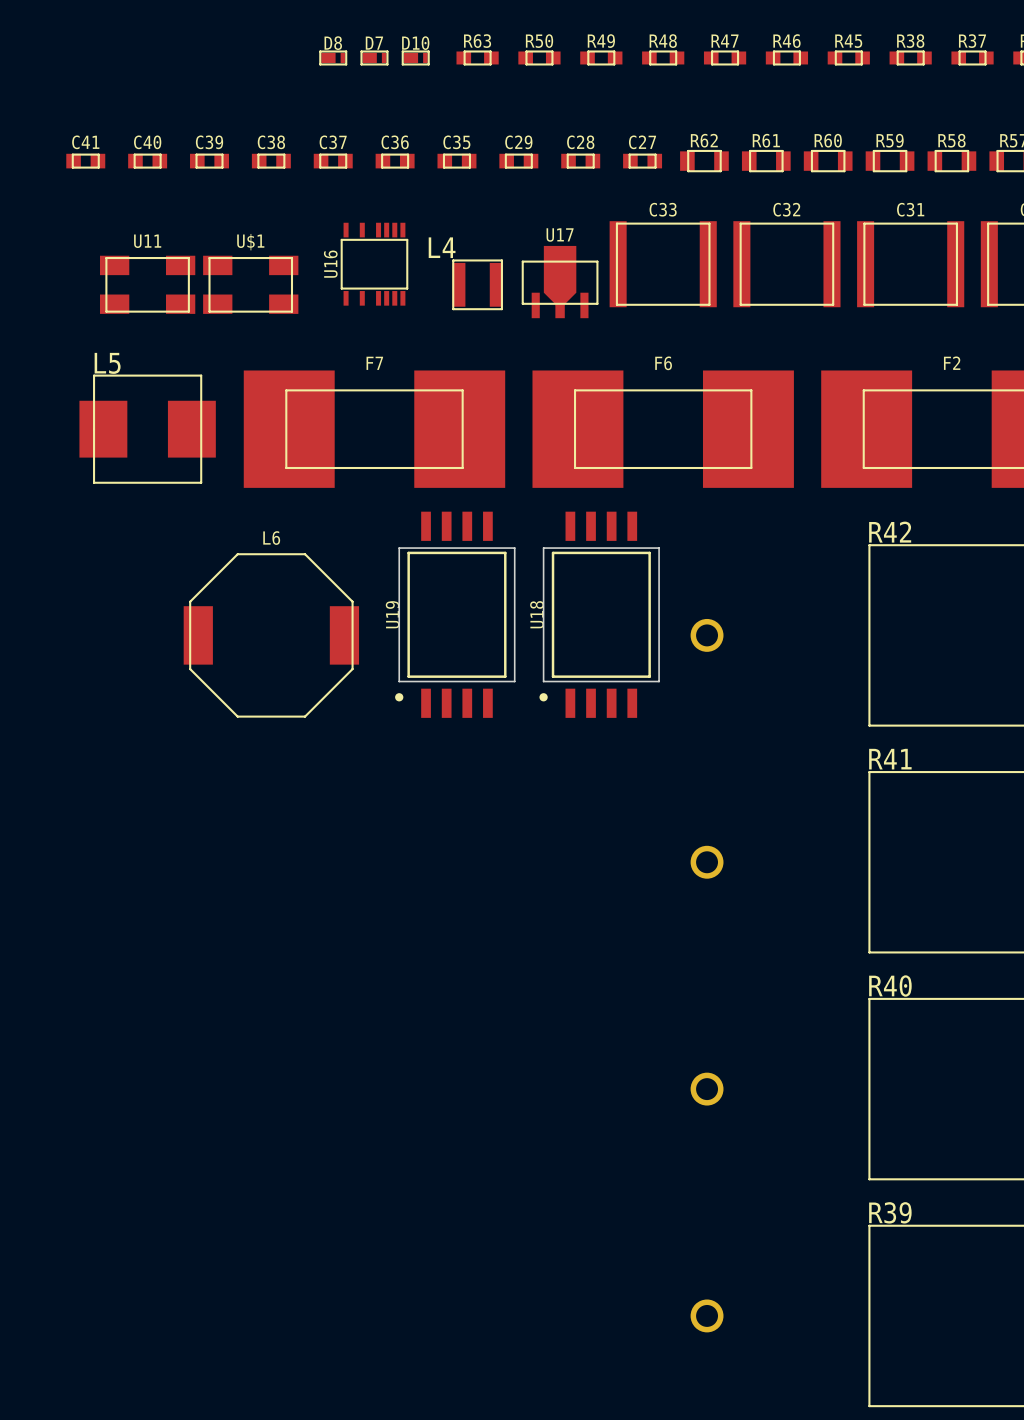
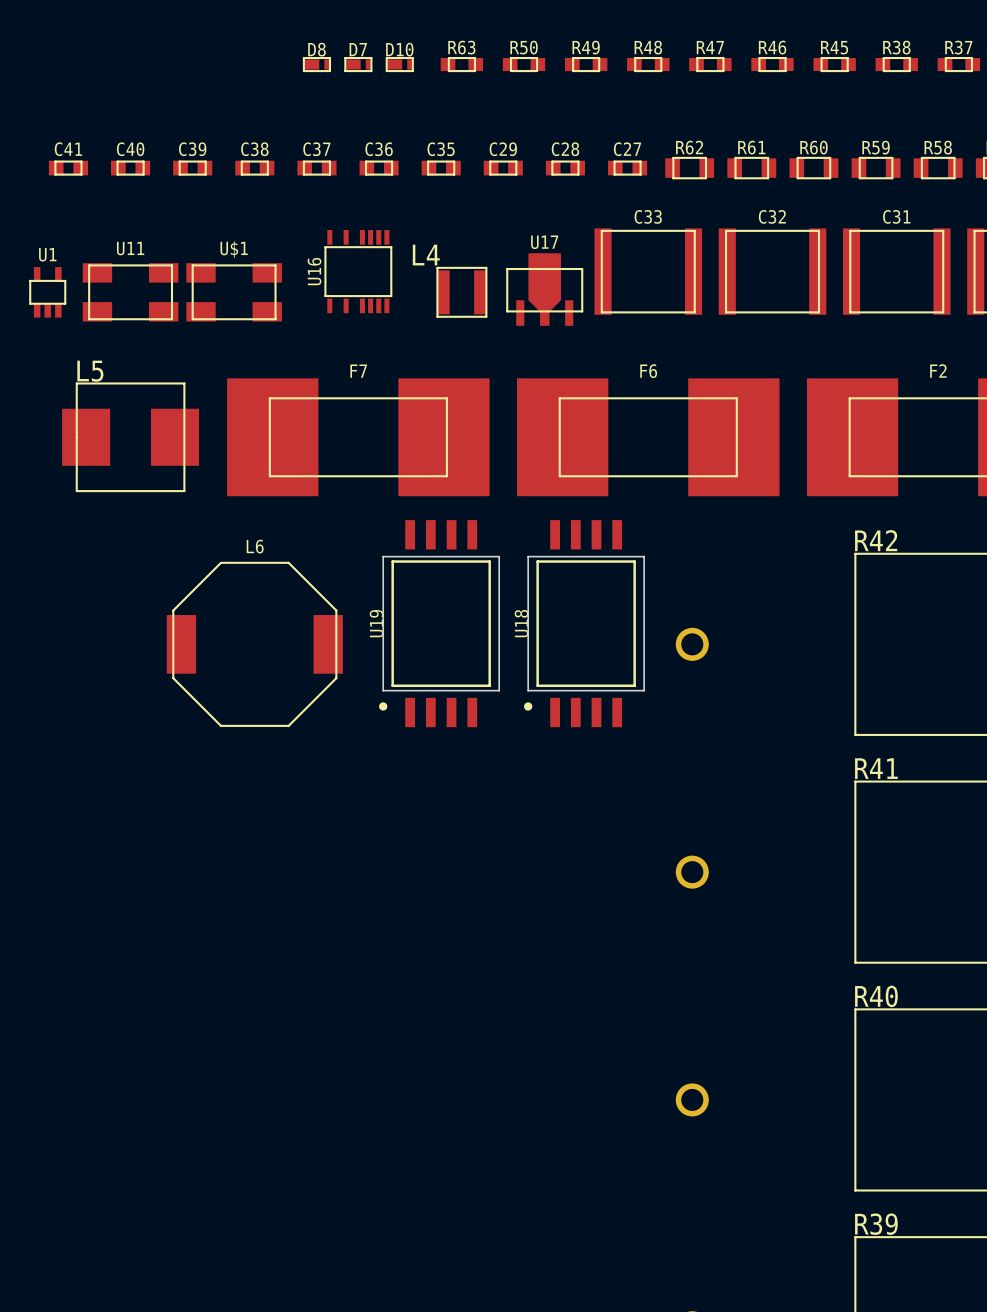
U1: none -> (47, 292)

